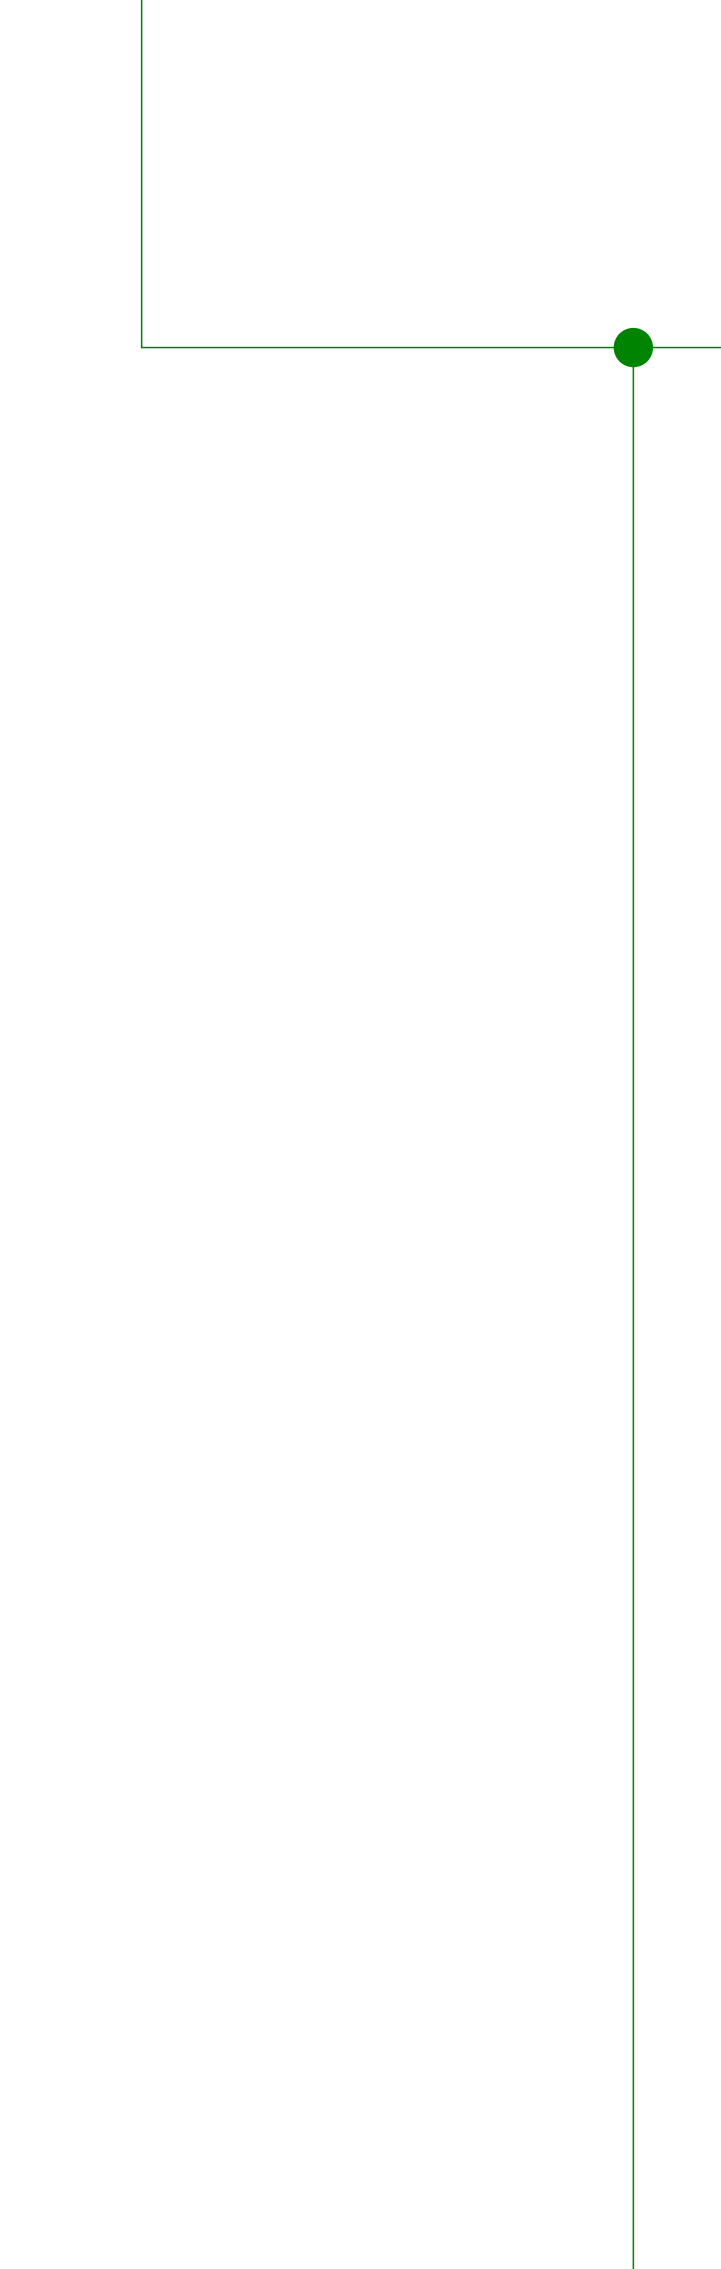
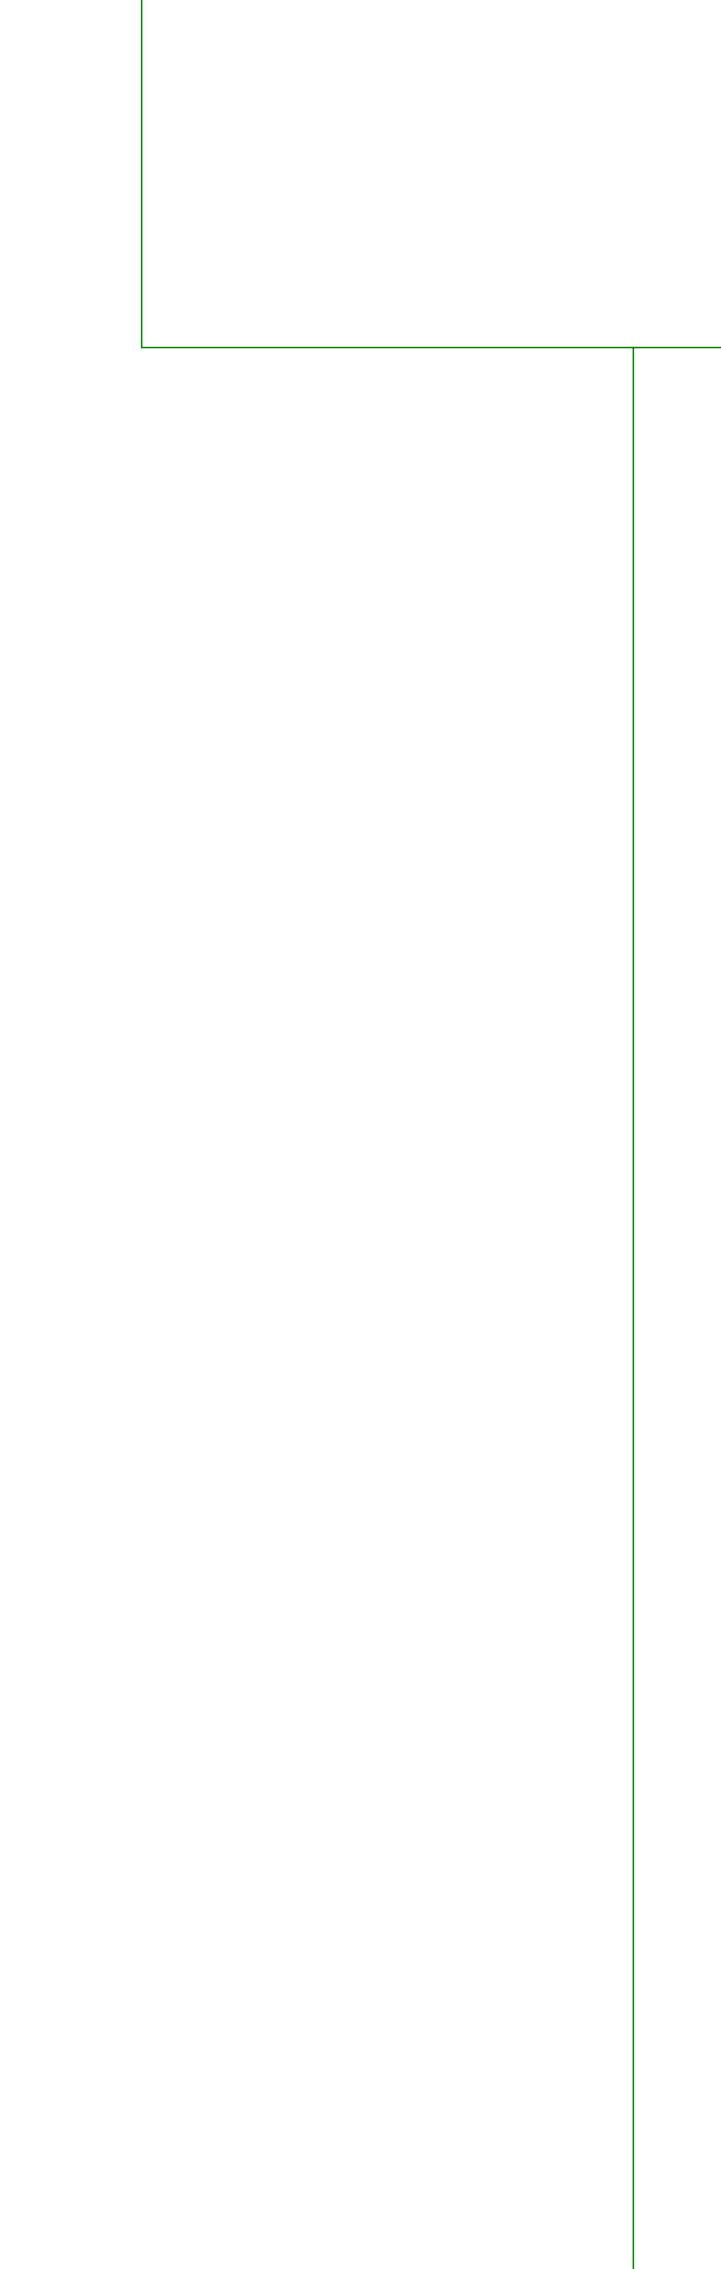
junction: (633, 347) -> none

